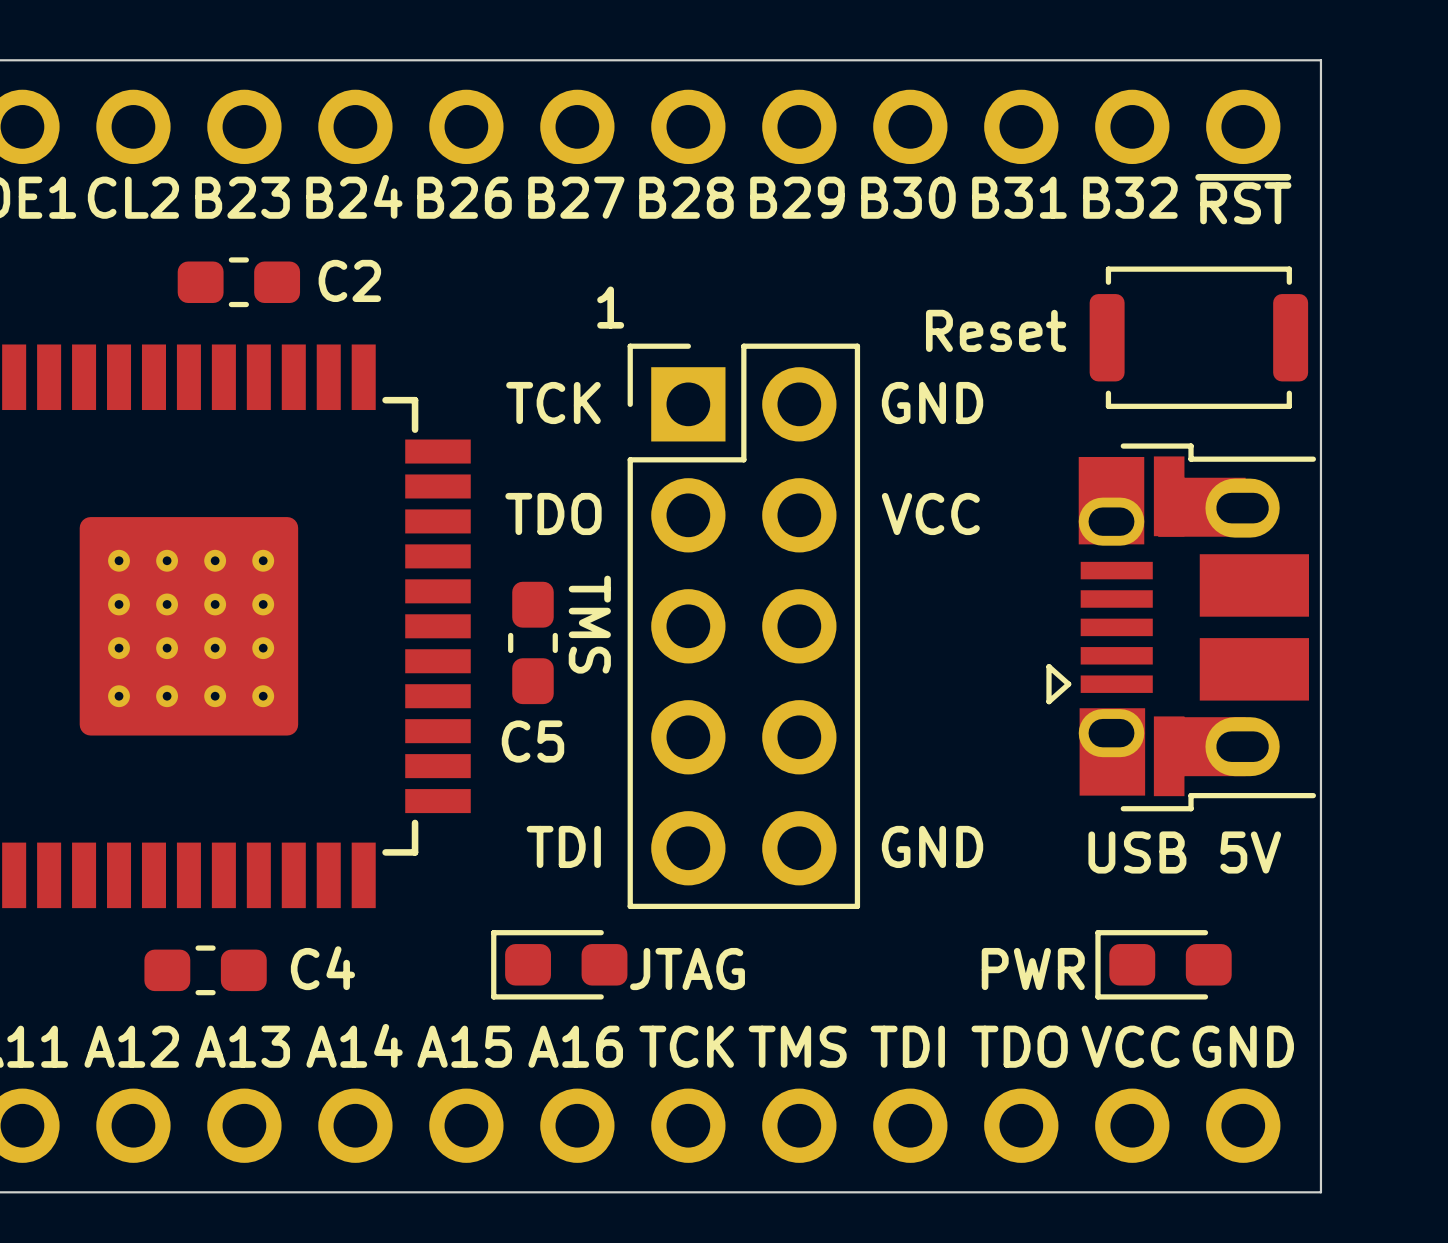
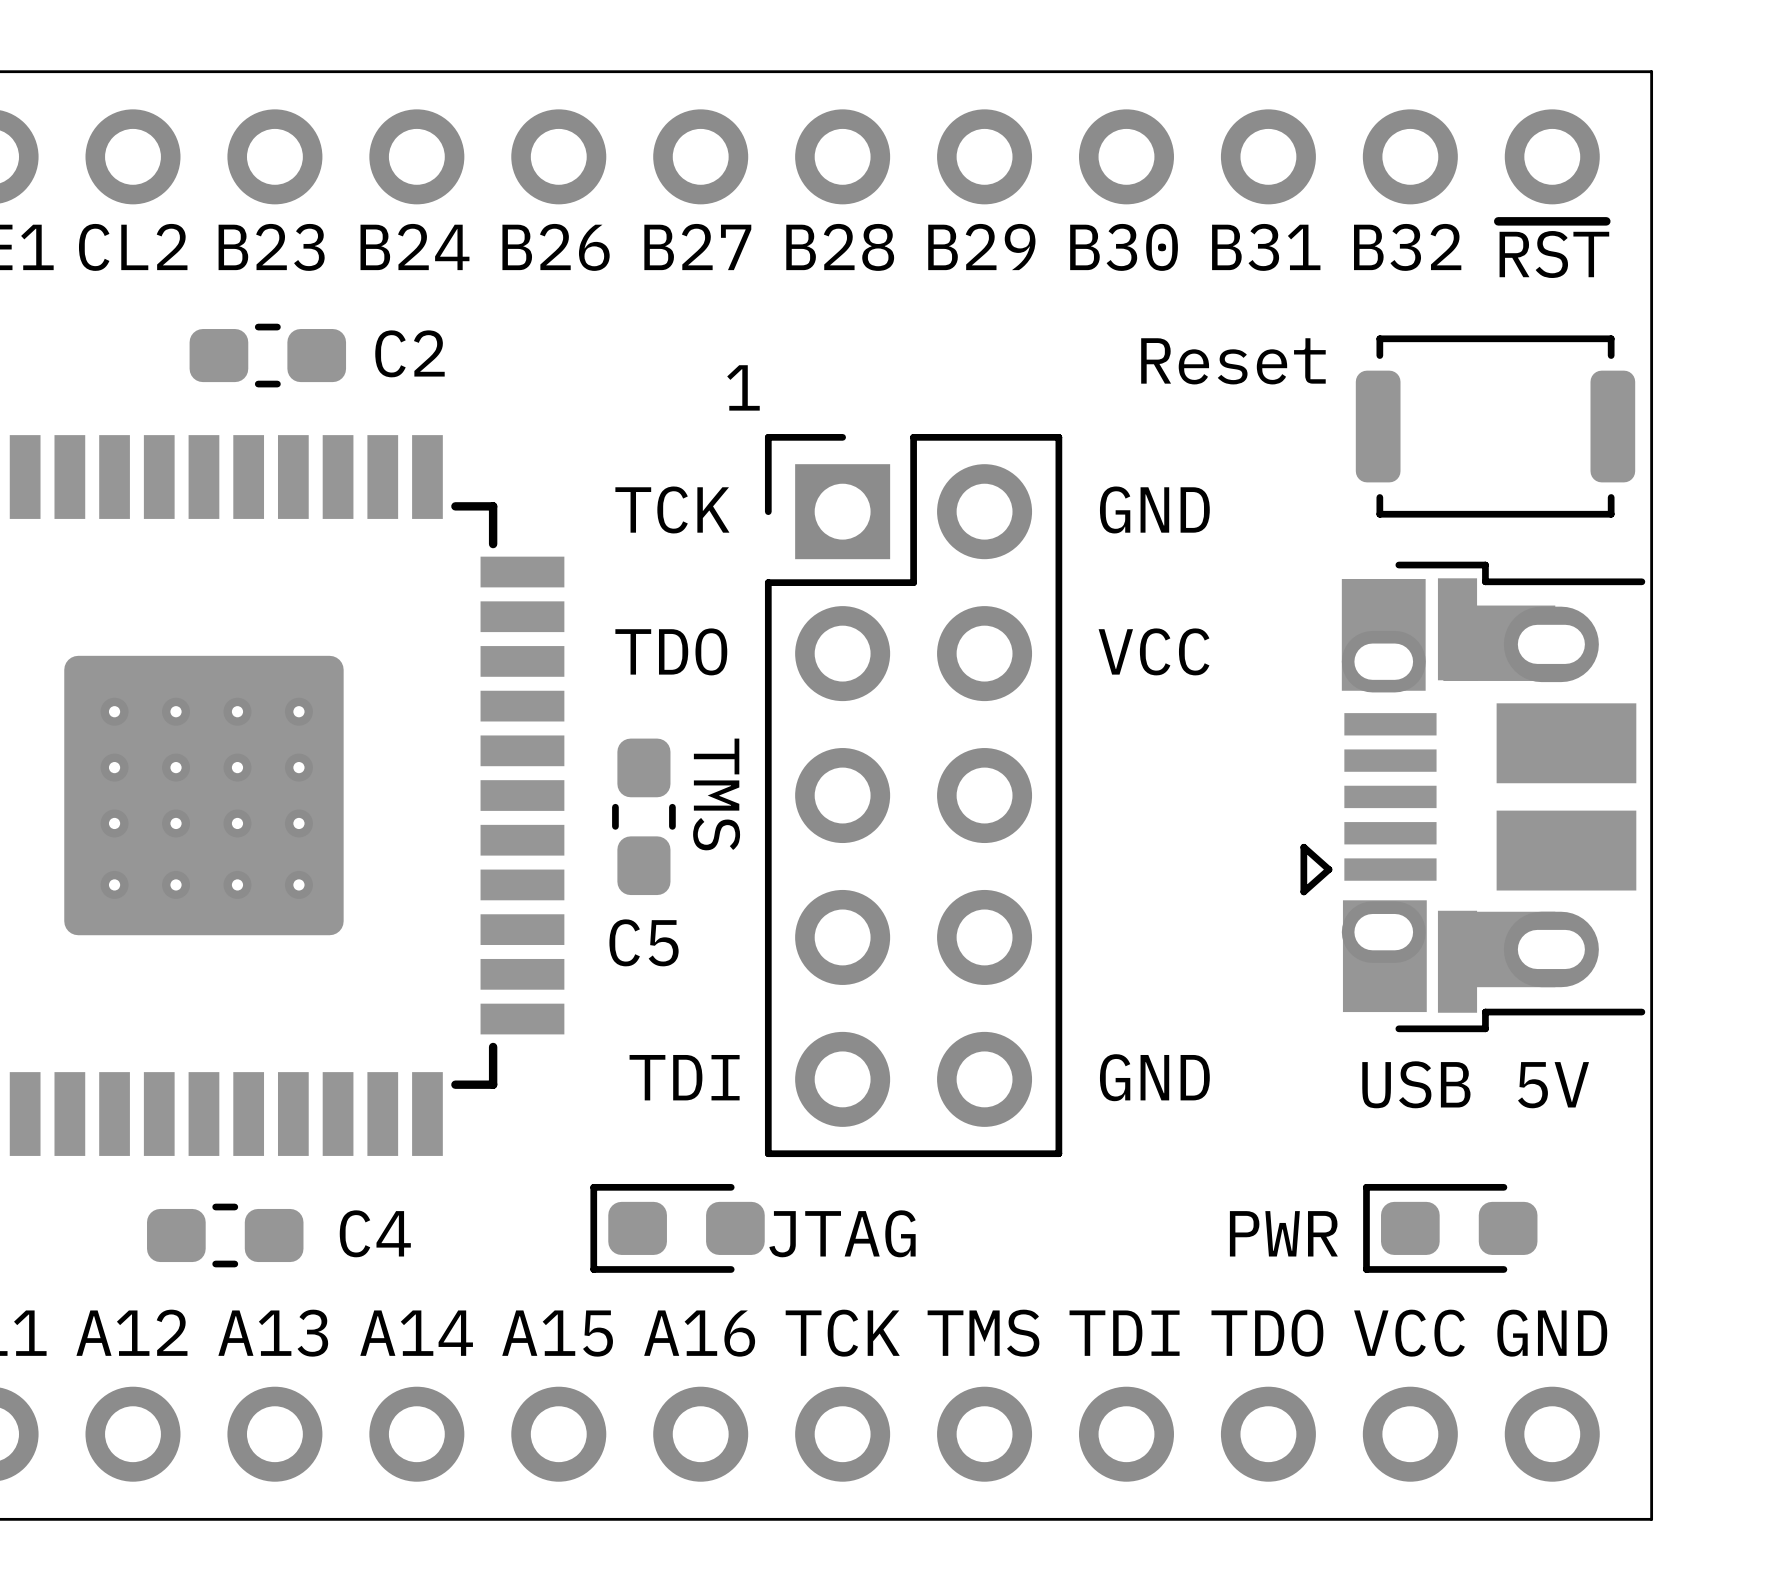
text position: Reset (996, 330) -> Reset (1233, 361)

